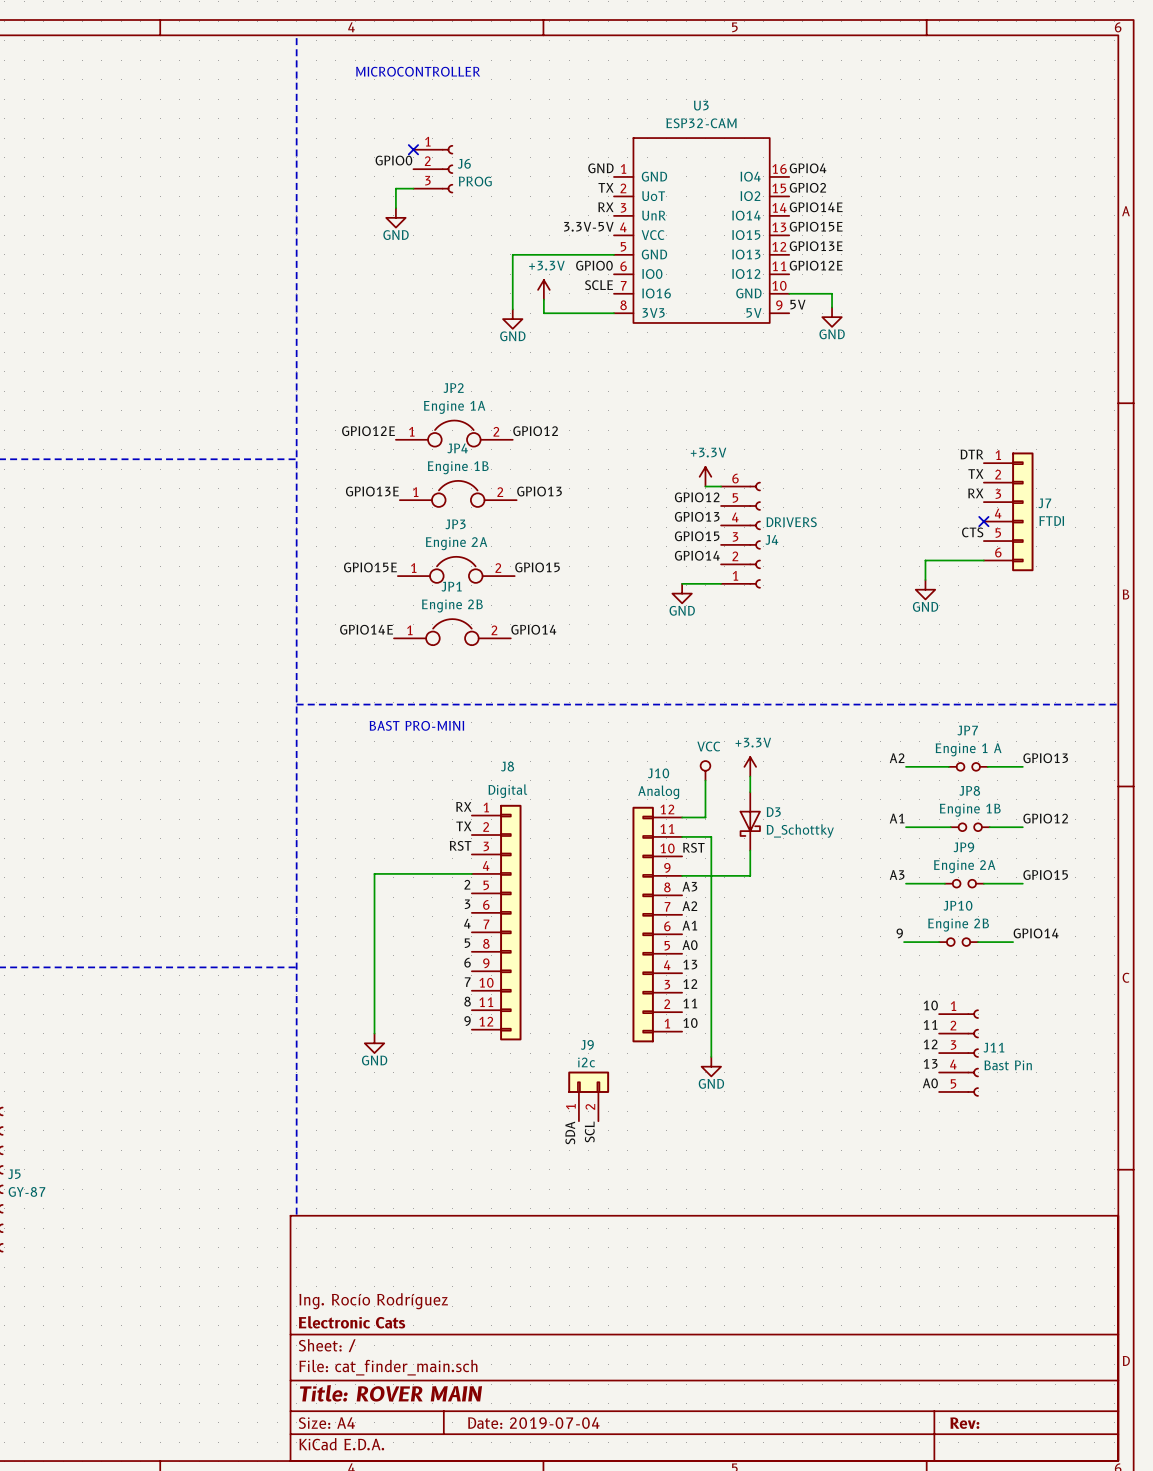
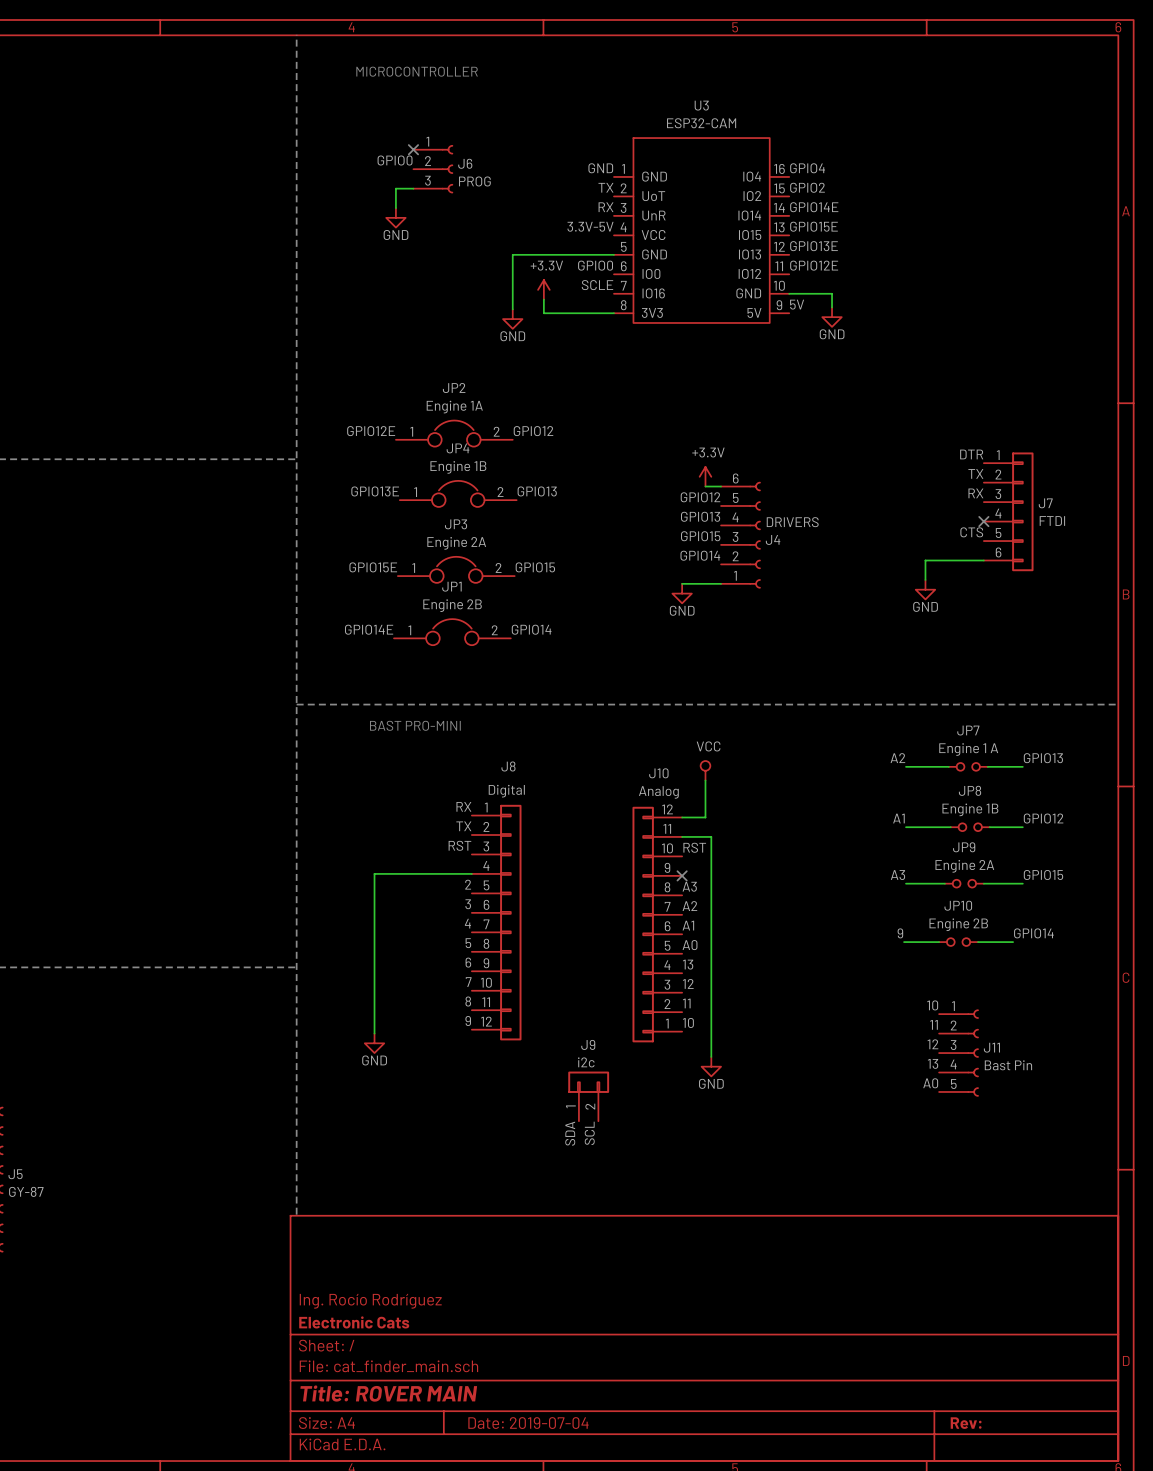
power symbol: +3.3V (750, 766) -> none
wire: (750, 776) (750, 792) -> none
D3: D_Schottky (750, 821) -> none
wire: (750, 850) (750, 875) (682, 875) -> none
no-connect mark: none -> (682, 875)

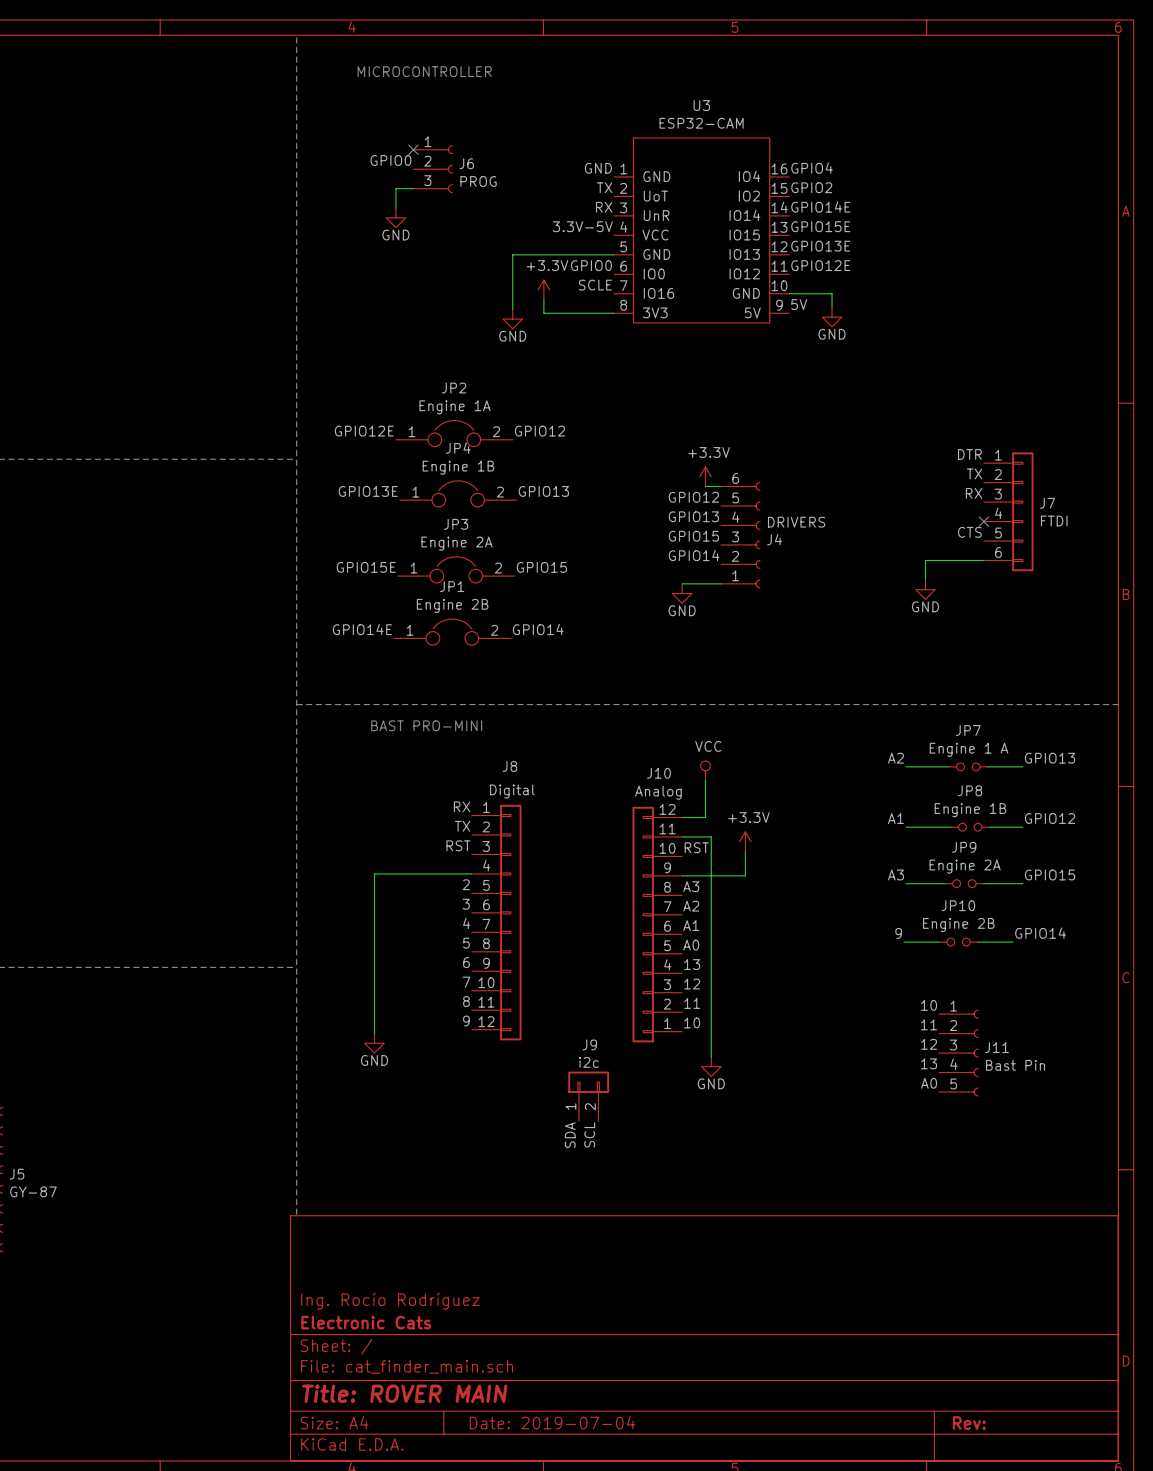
power symbol: none -> +3.3V (745, 841)
wire: none -> (745, 851) (745, 875) (682, 875)
no-connect mark: (682, 875) -> none

